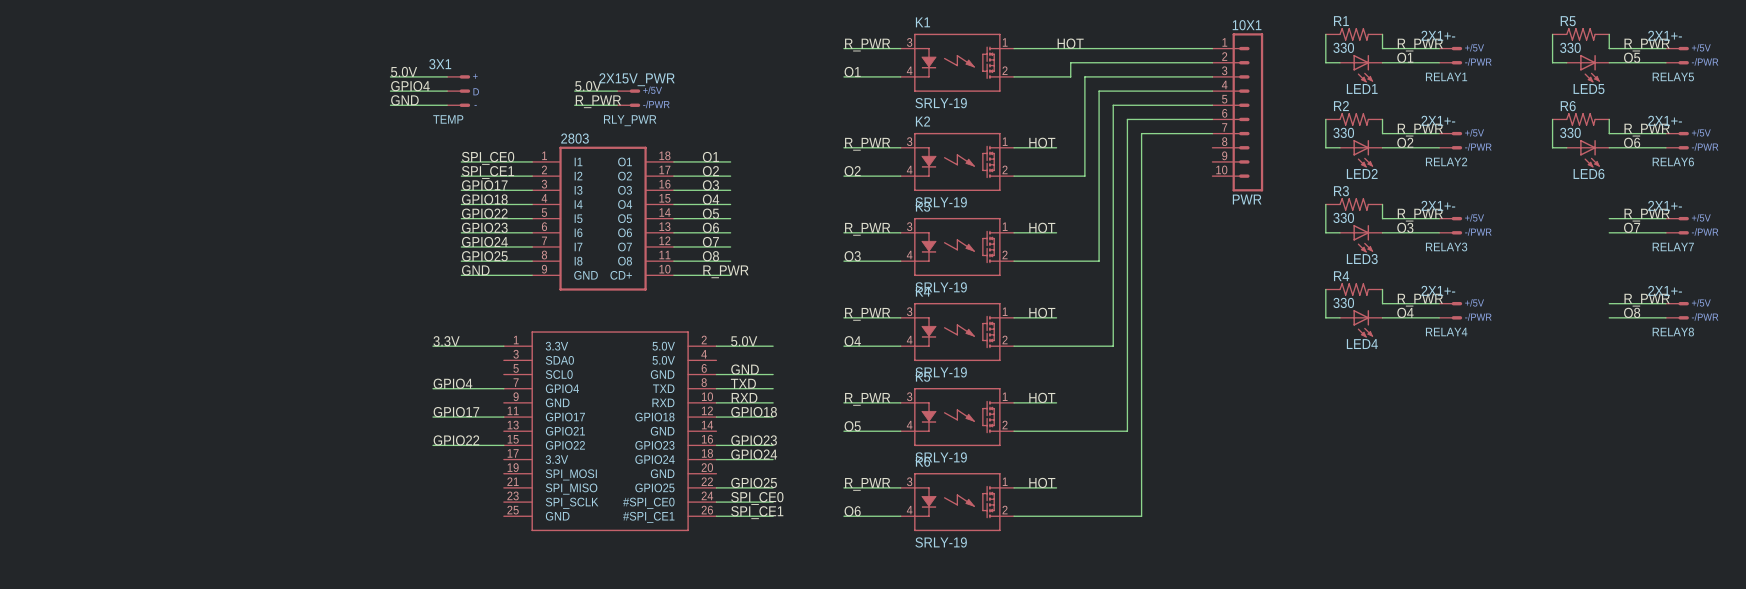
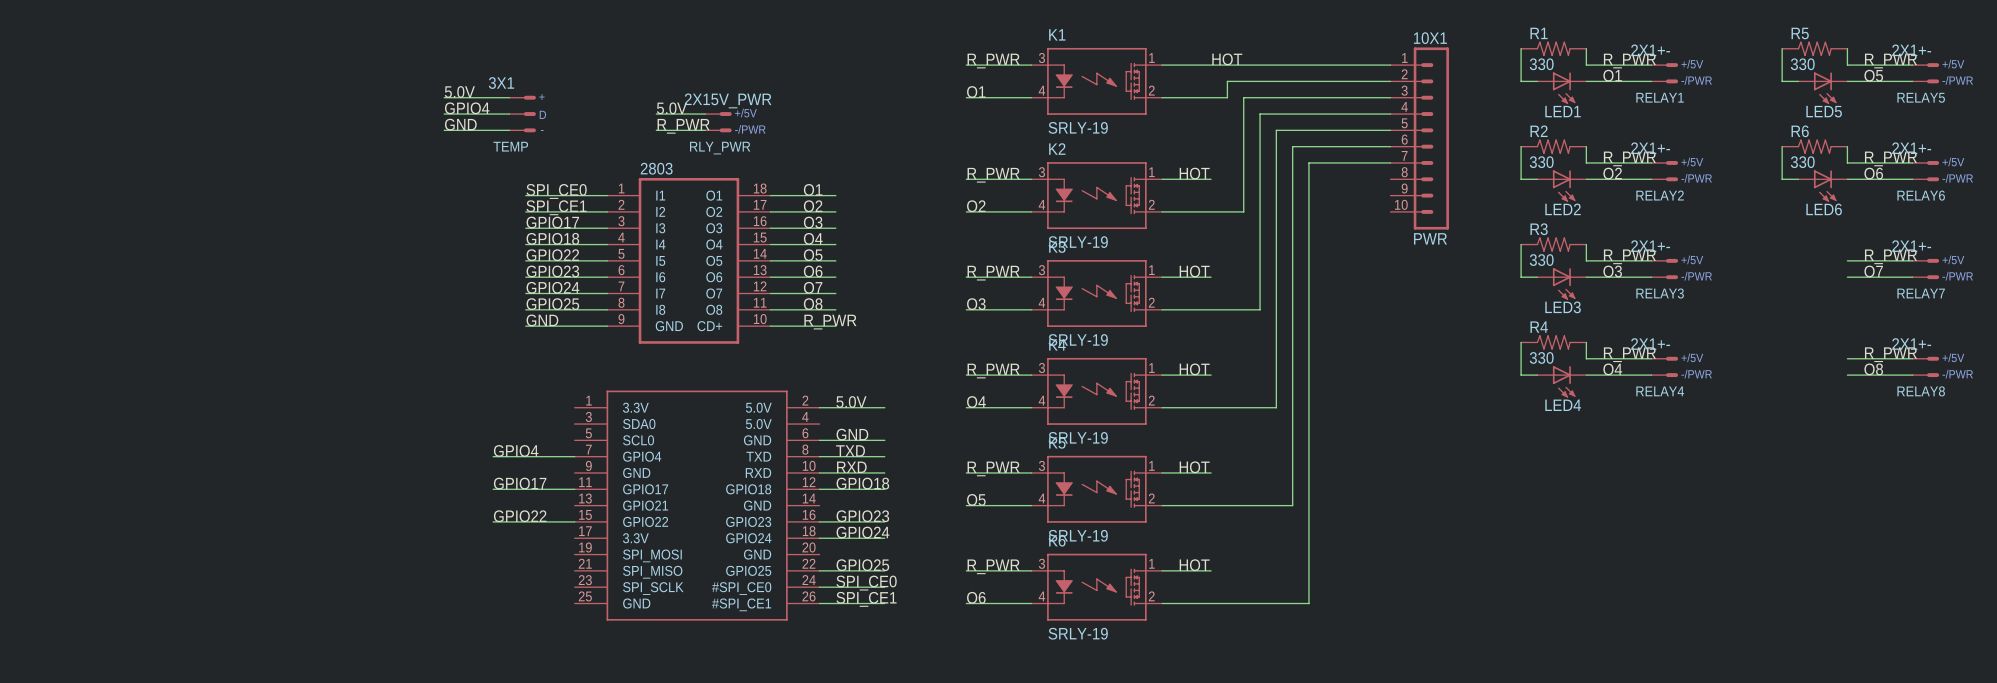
label: 3.3V (446, 341) -> none
wire: (433, 346) (503, 346) -> none

